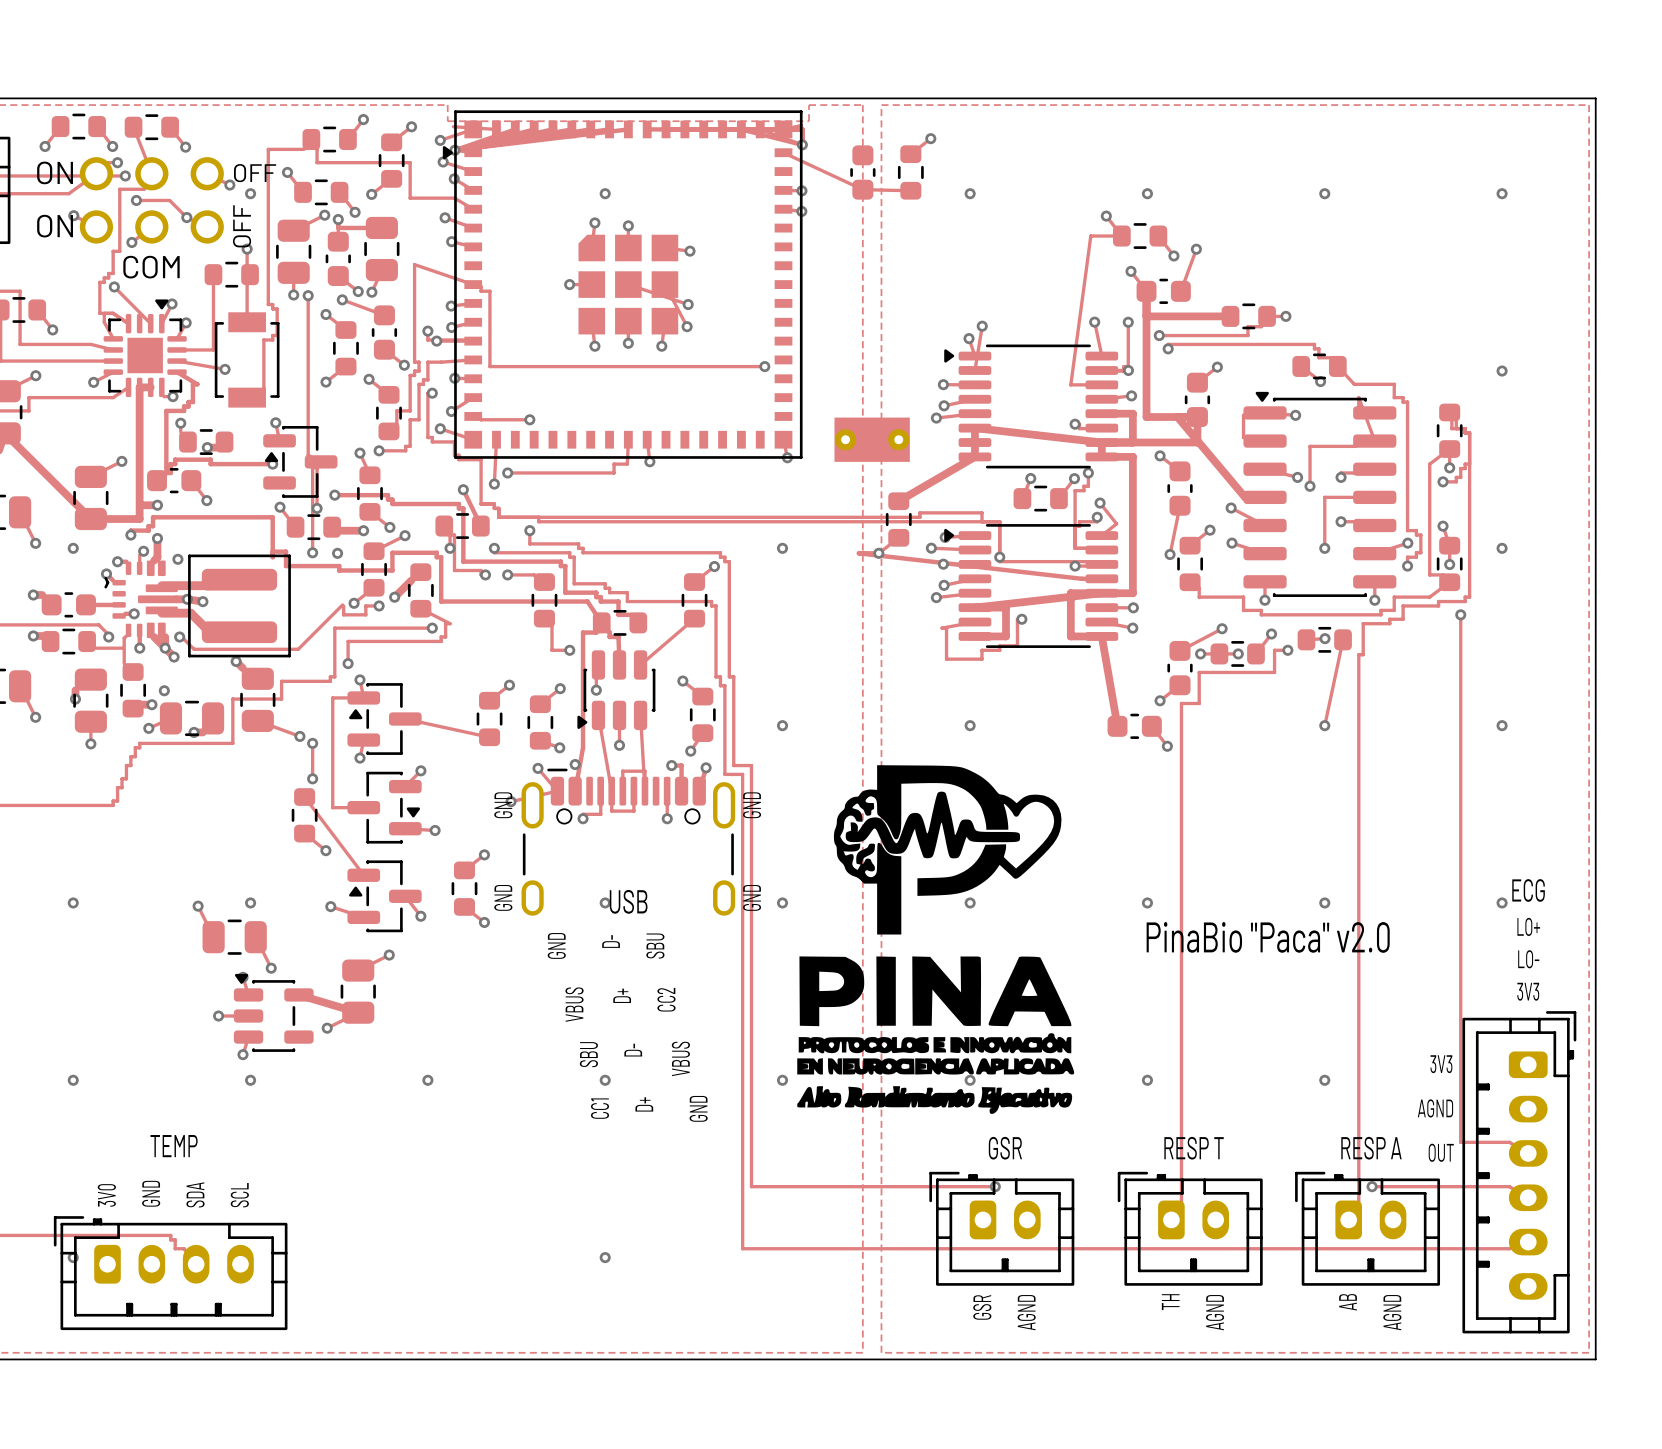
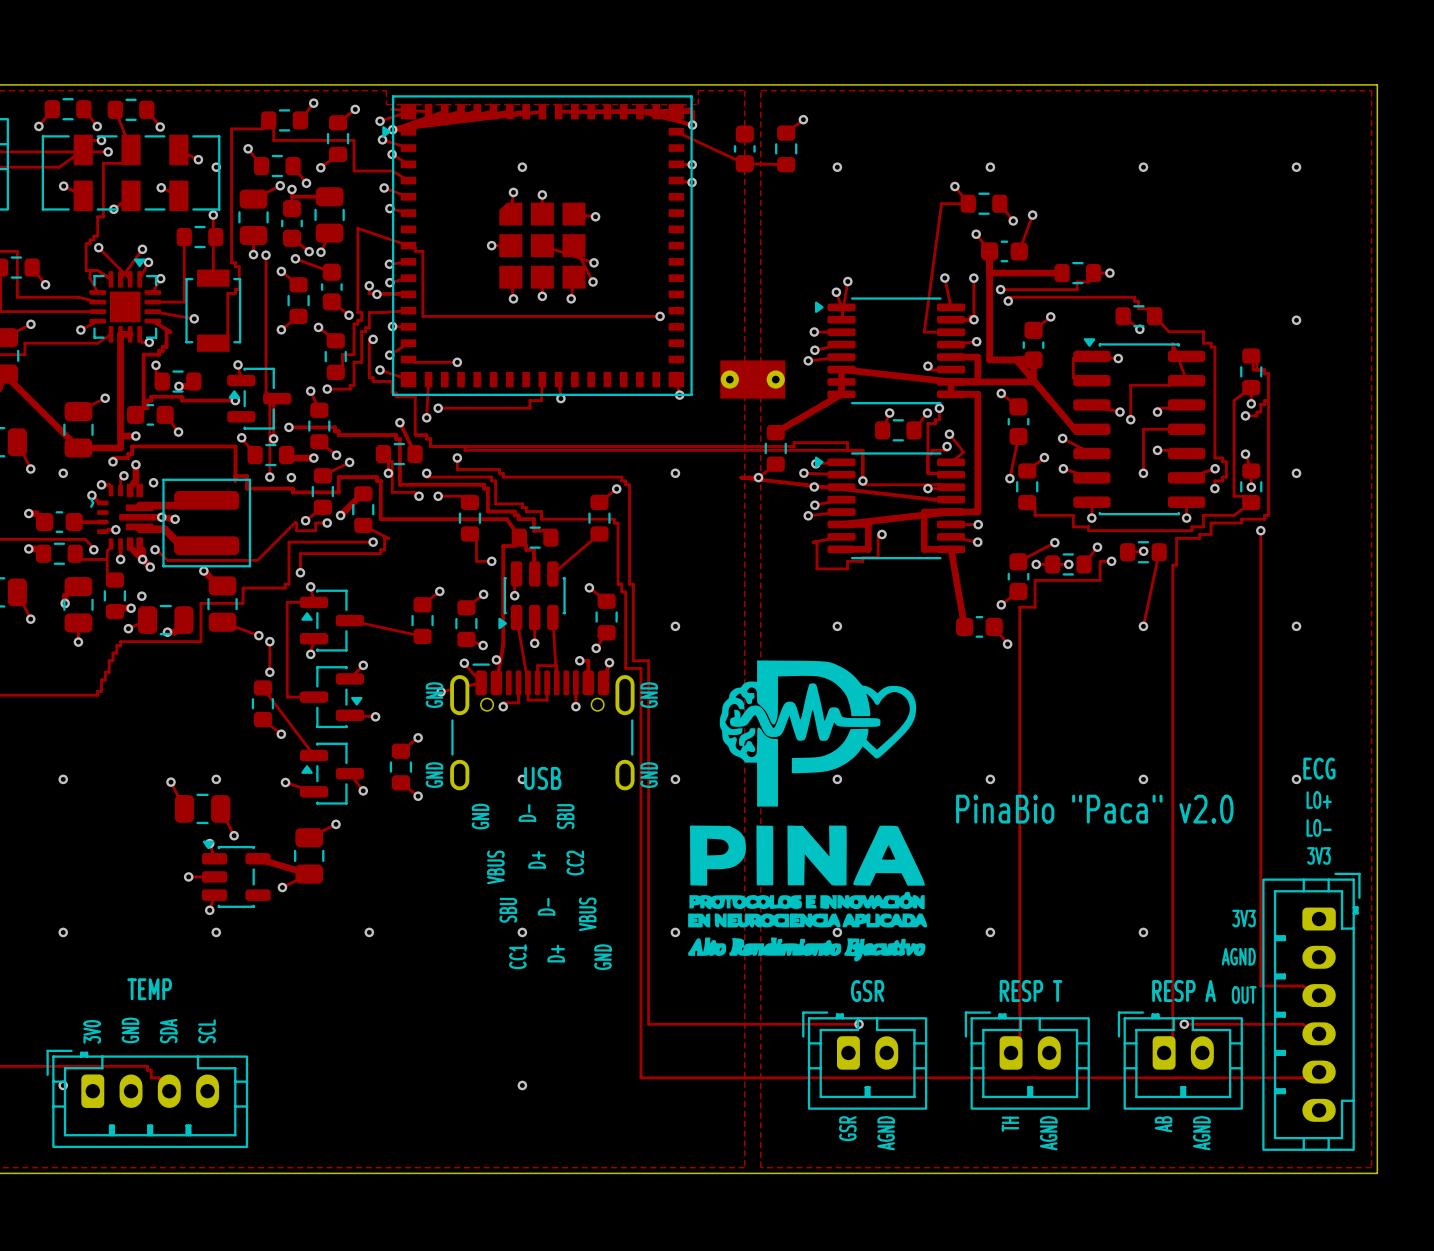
part footprint: [79, 157, 224, 244] -> [41, 134, 221, 212]
track: (136, 200) (169, 200) (186, 217) -> none
via position: (136, 200) -> (142, 249)
track: none -> (142, 249) (120, 279)

